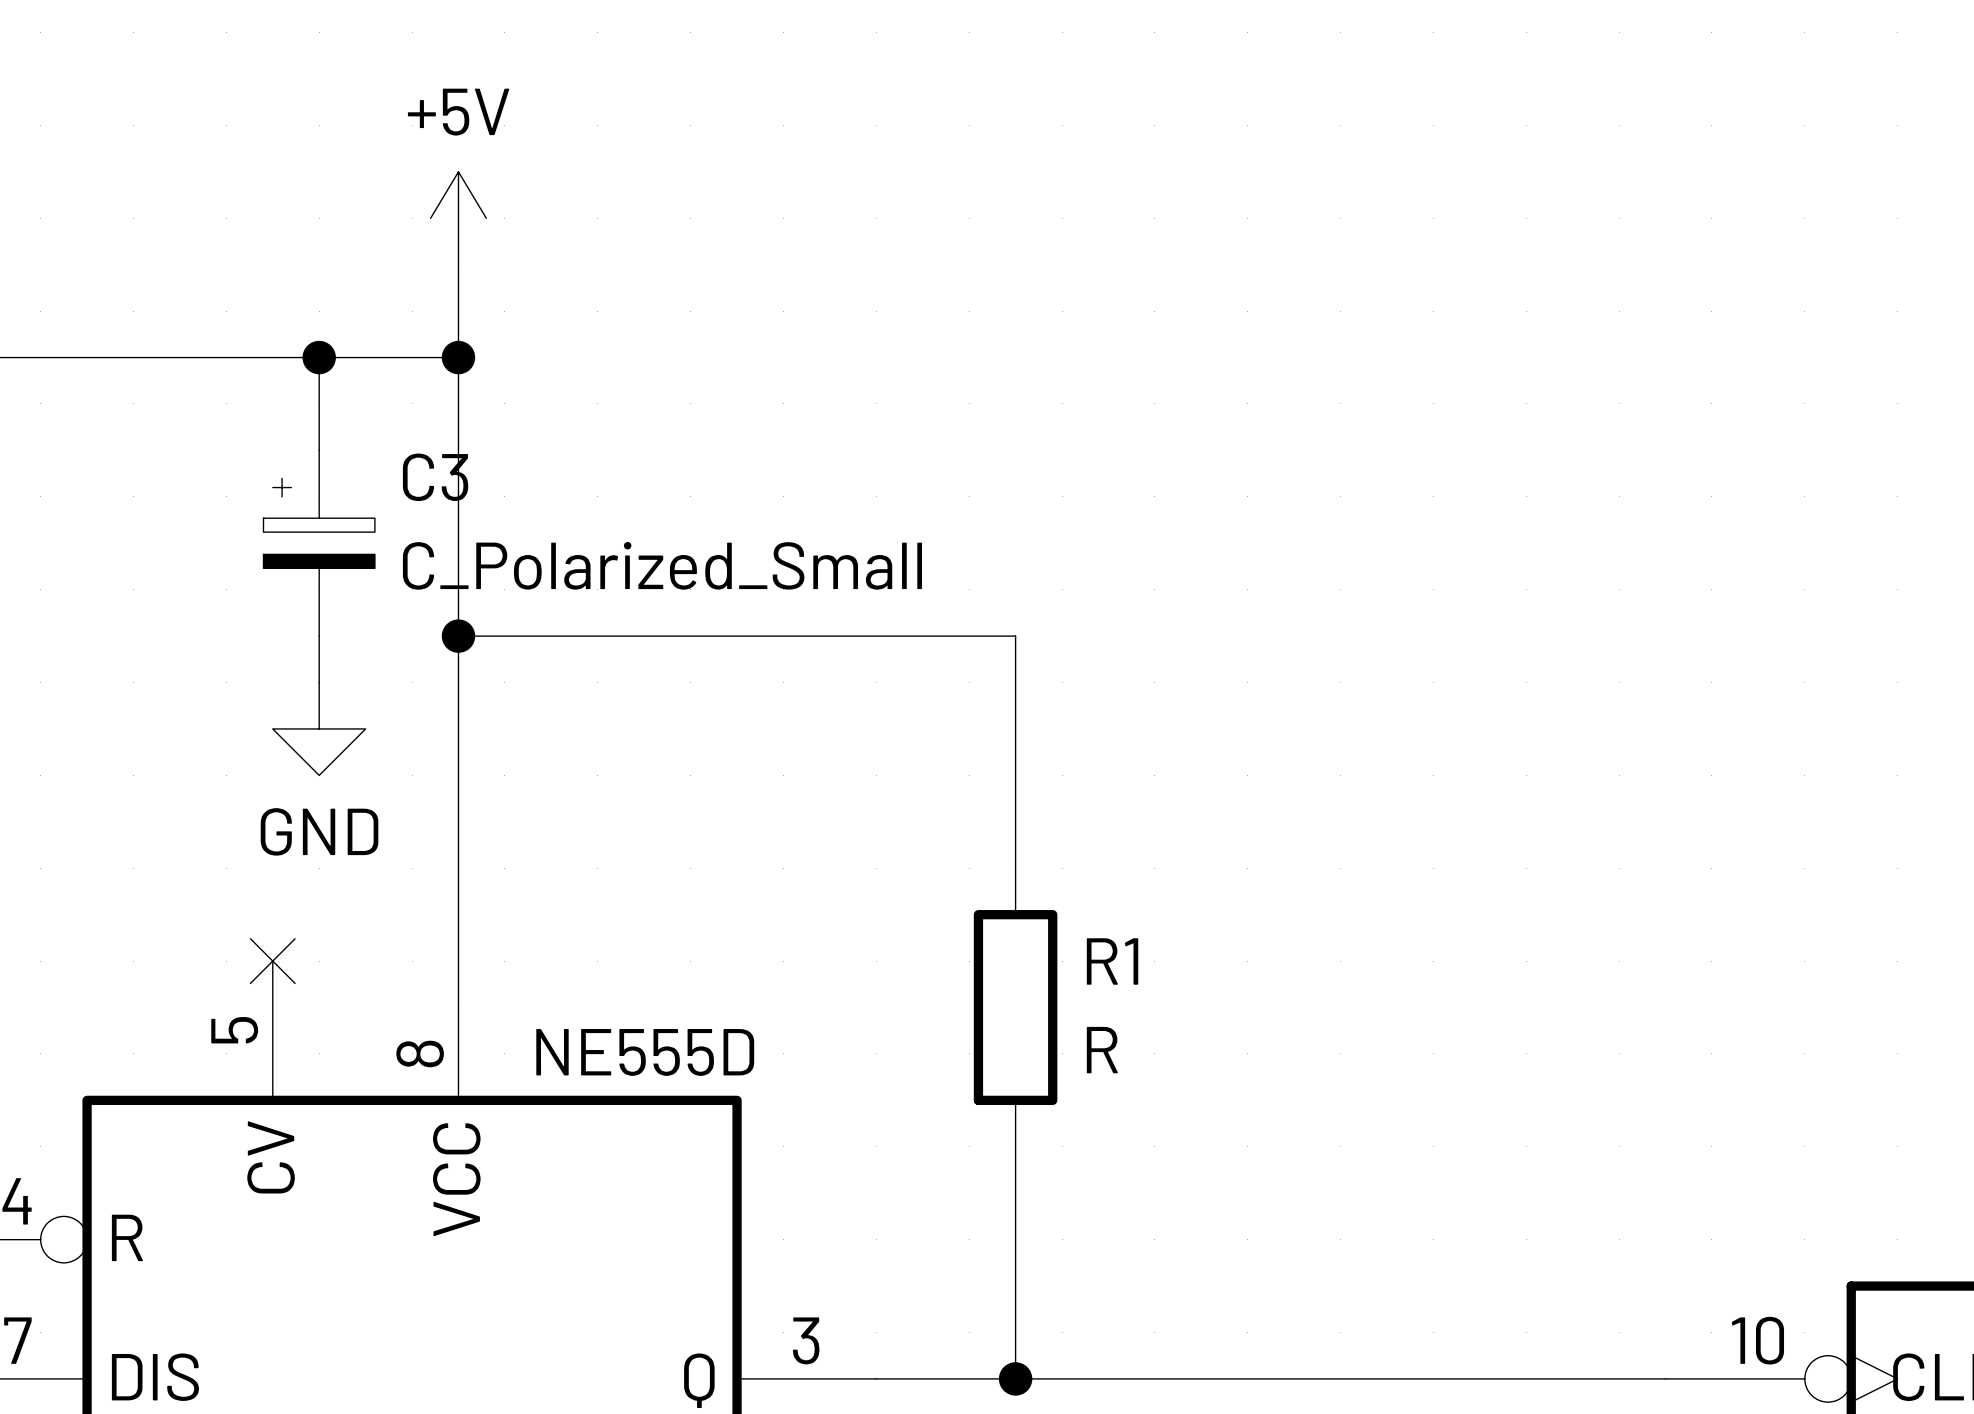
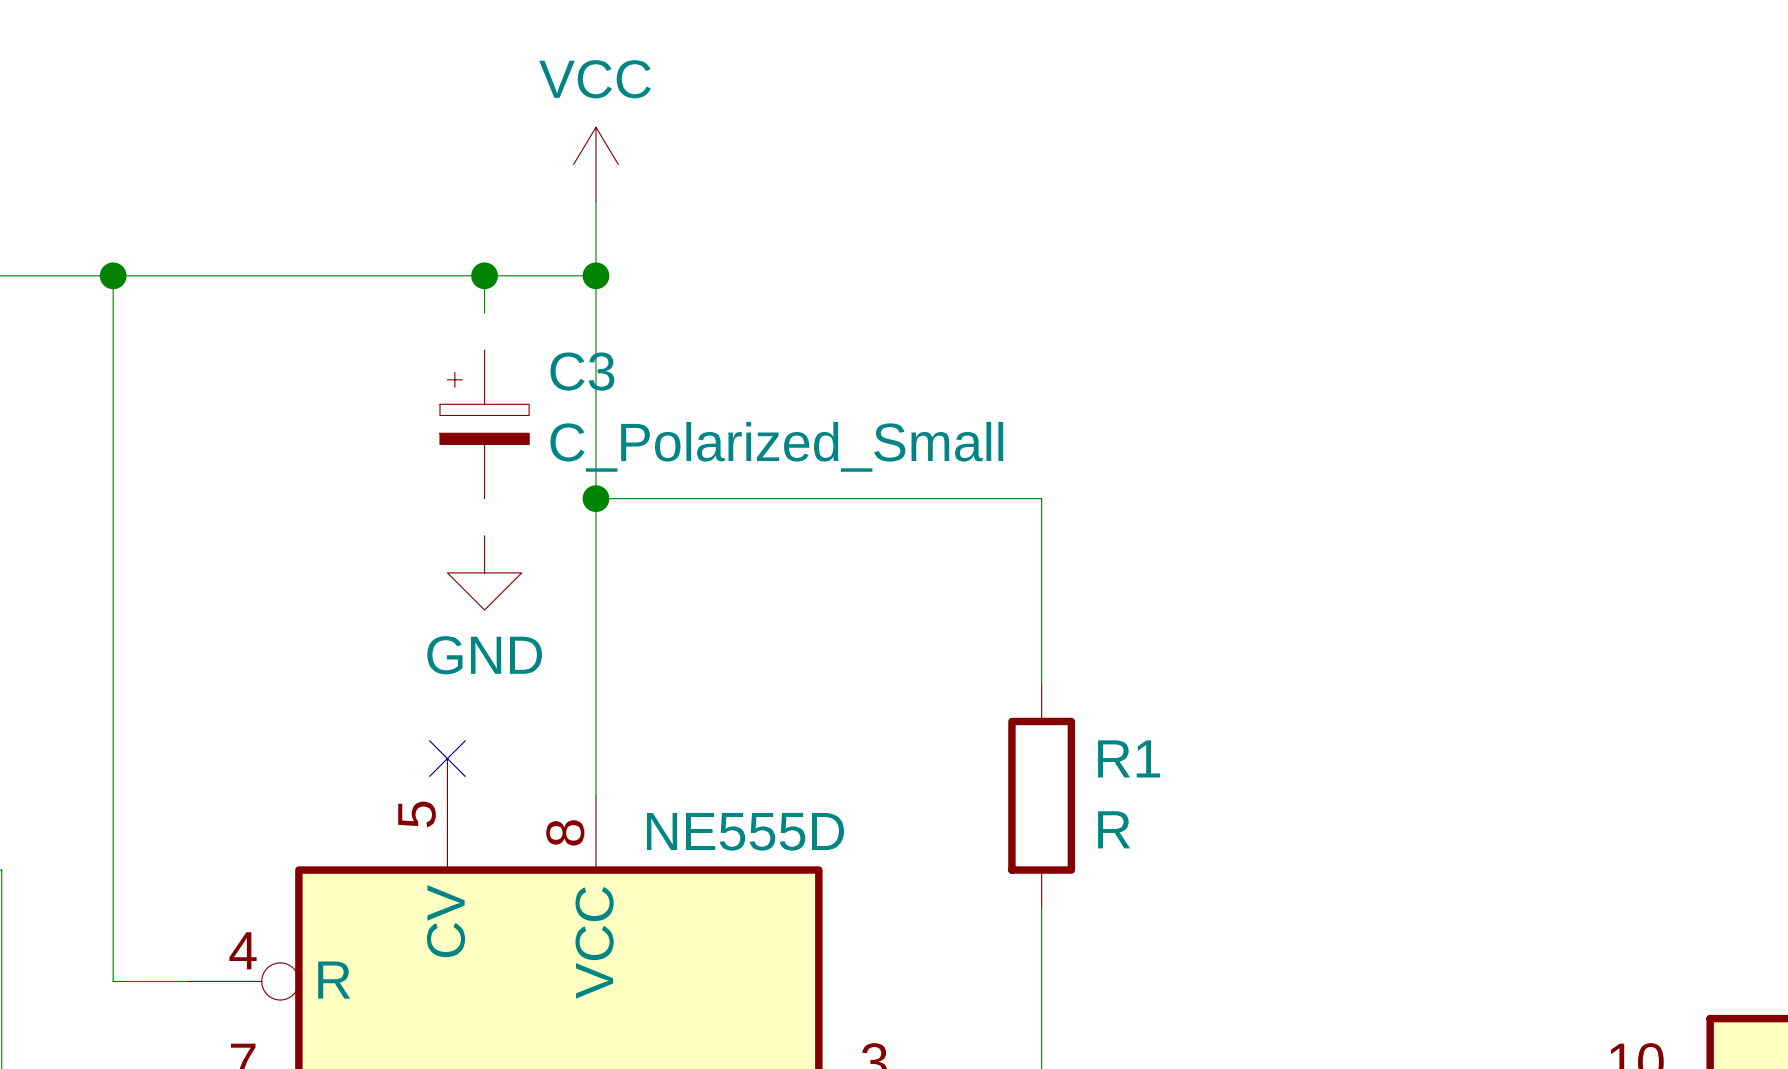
power symbol: +5V (458, 218) -> VCC (595, 164)
wire: (319, 403) (319, 450) -> none
wire: (319, 636) (319, 682) -> none

